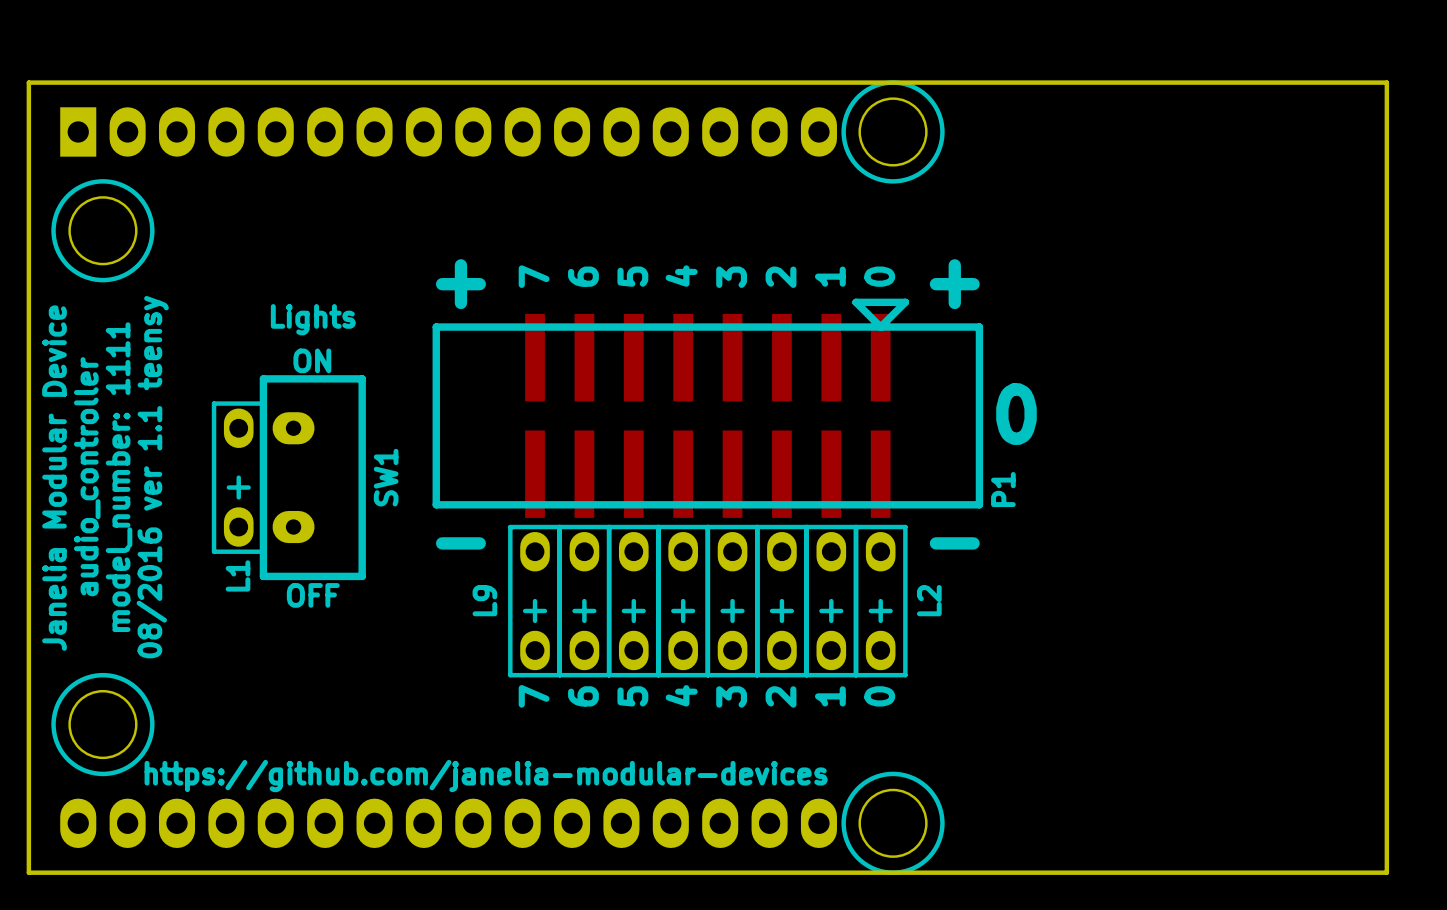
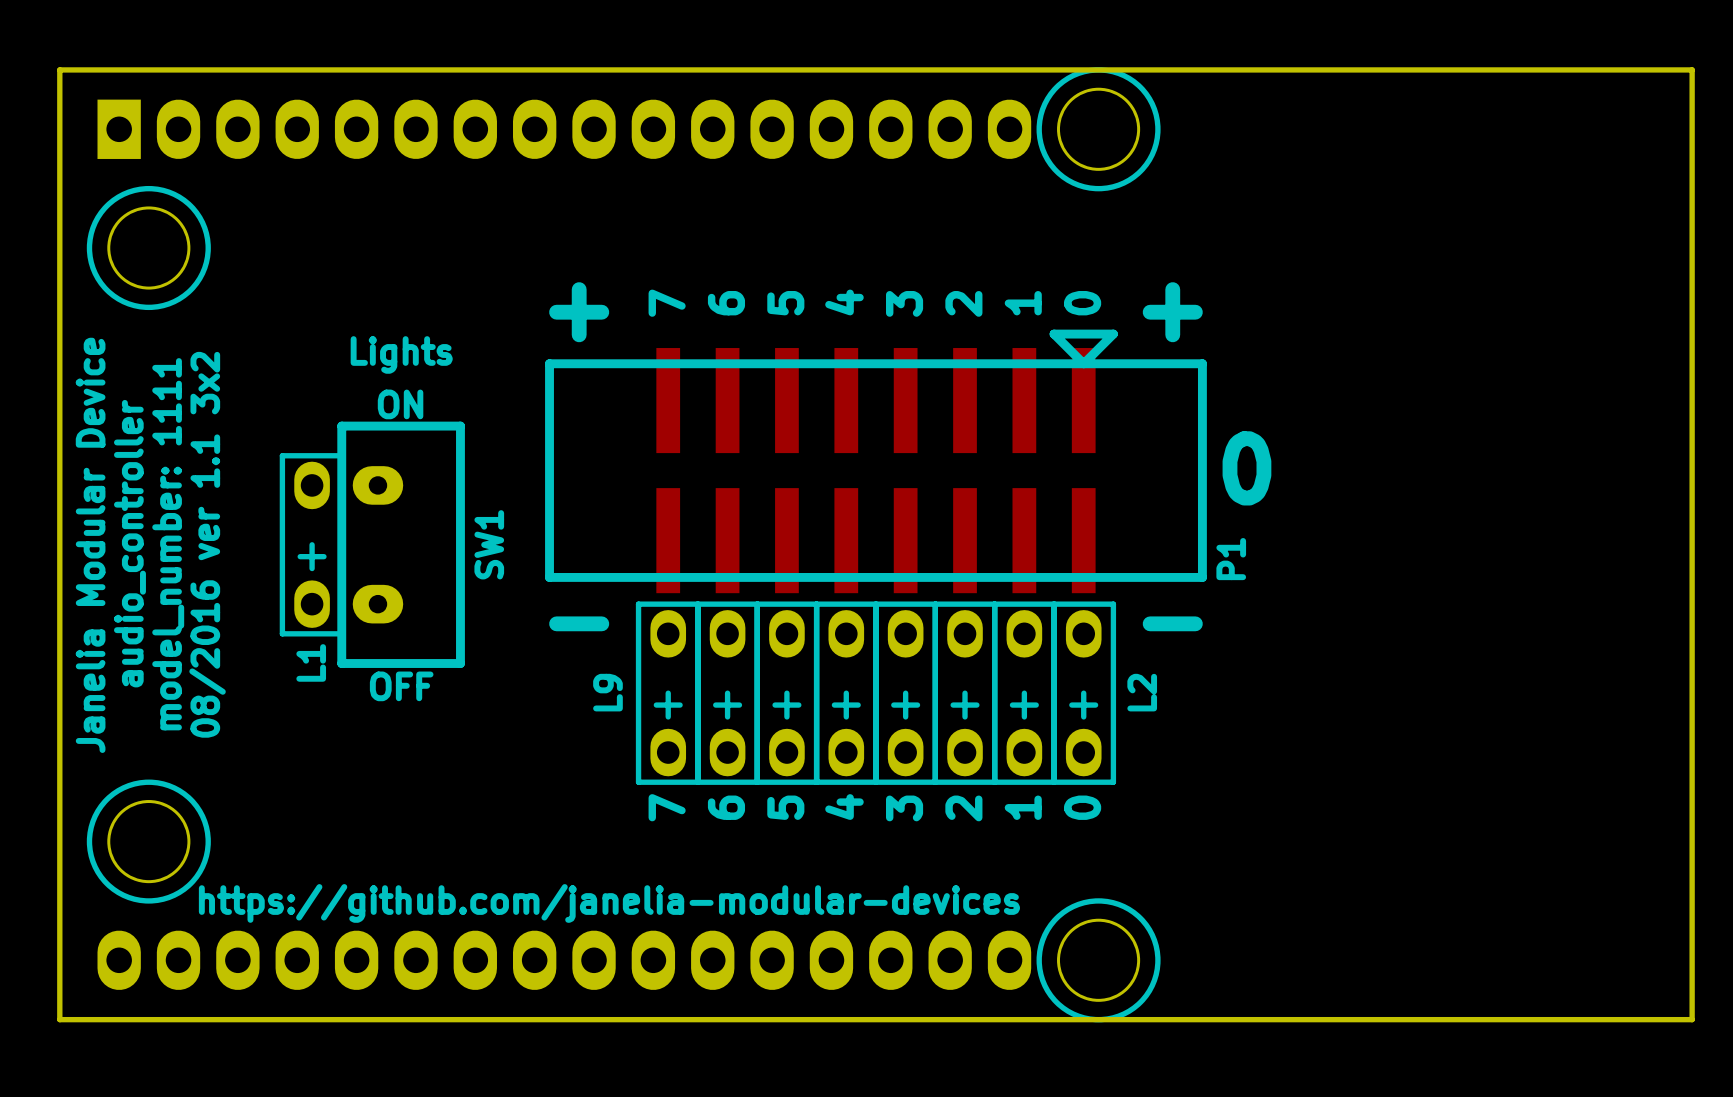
text: 08/2016 ver 1.1 teensy (152, 477) -> 08/2016 ver 1.1 3x2 (207, 544)

